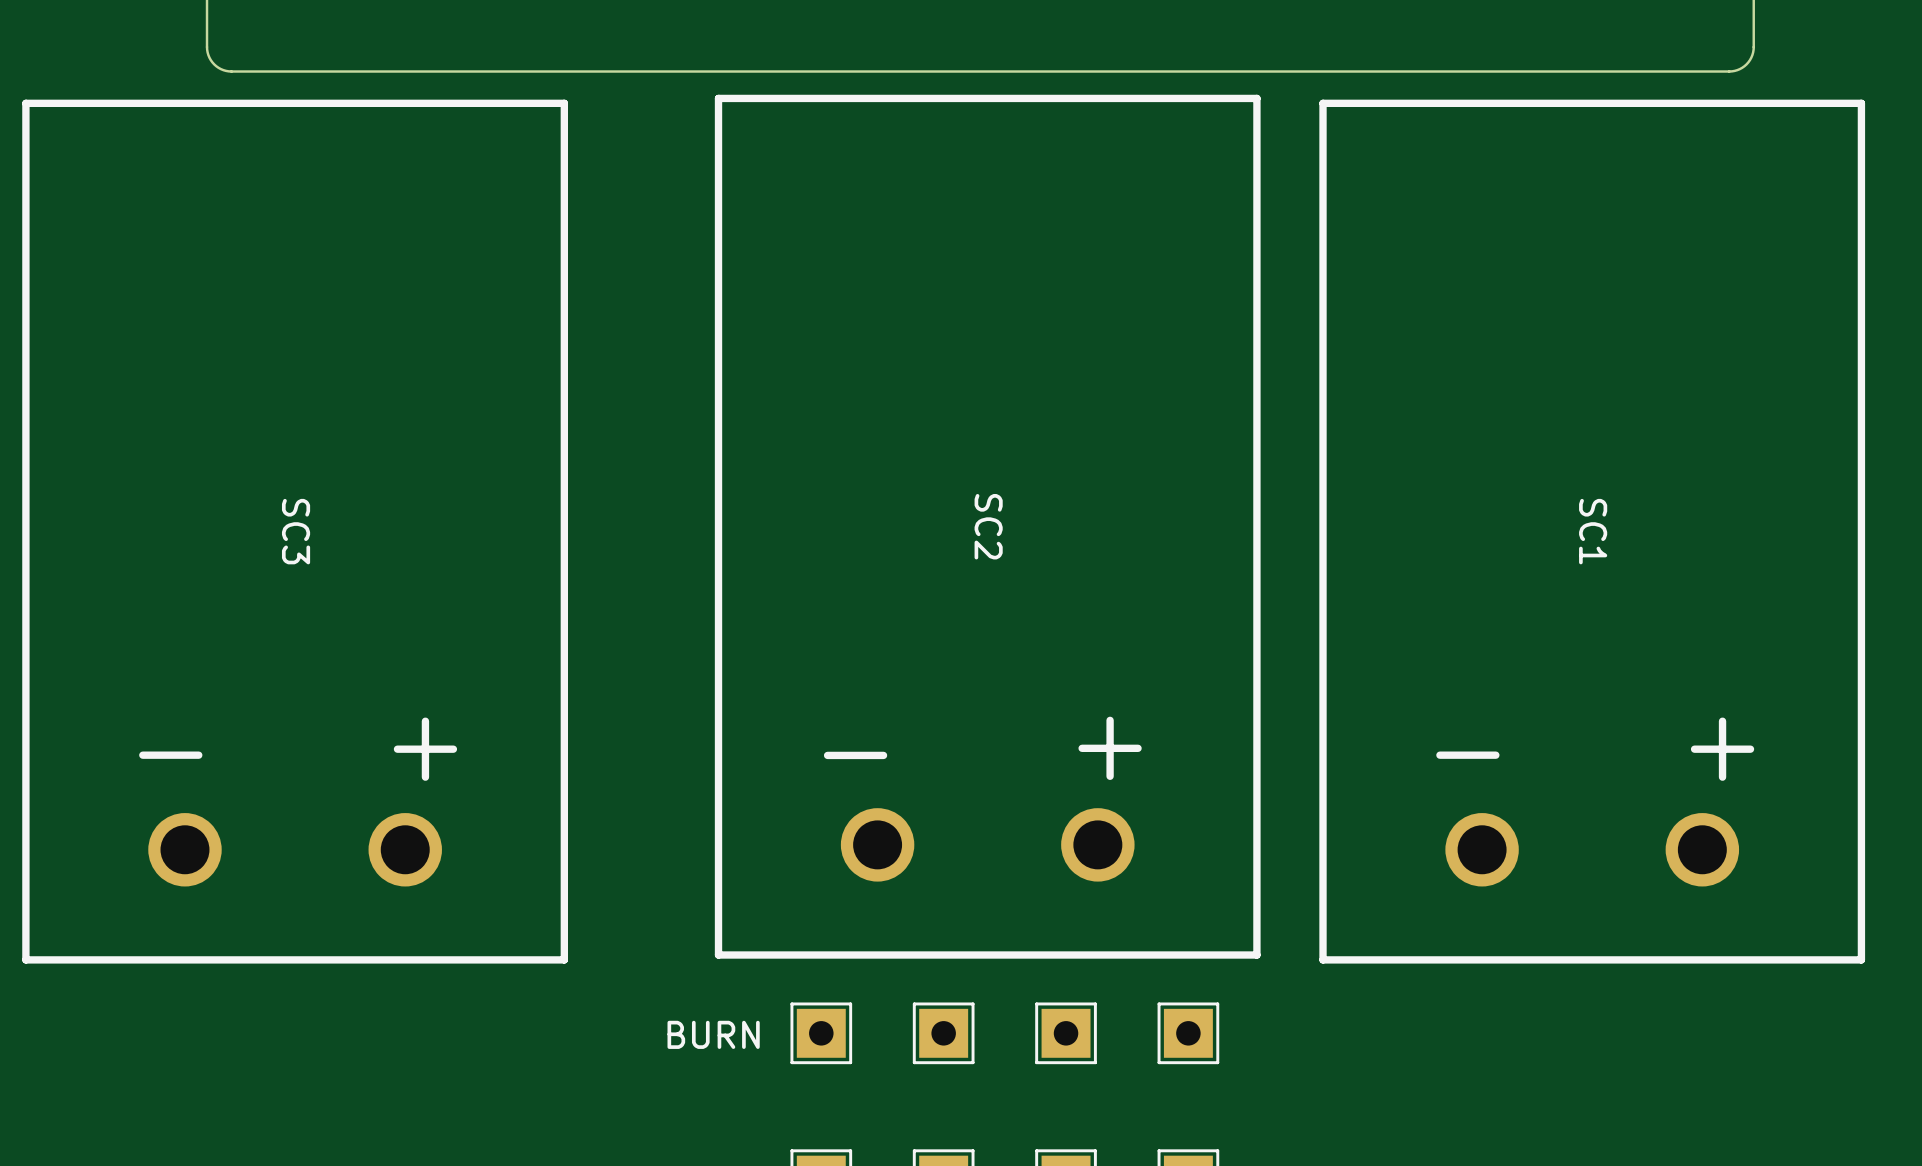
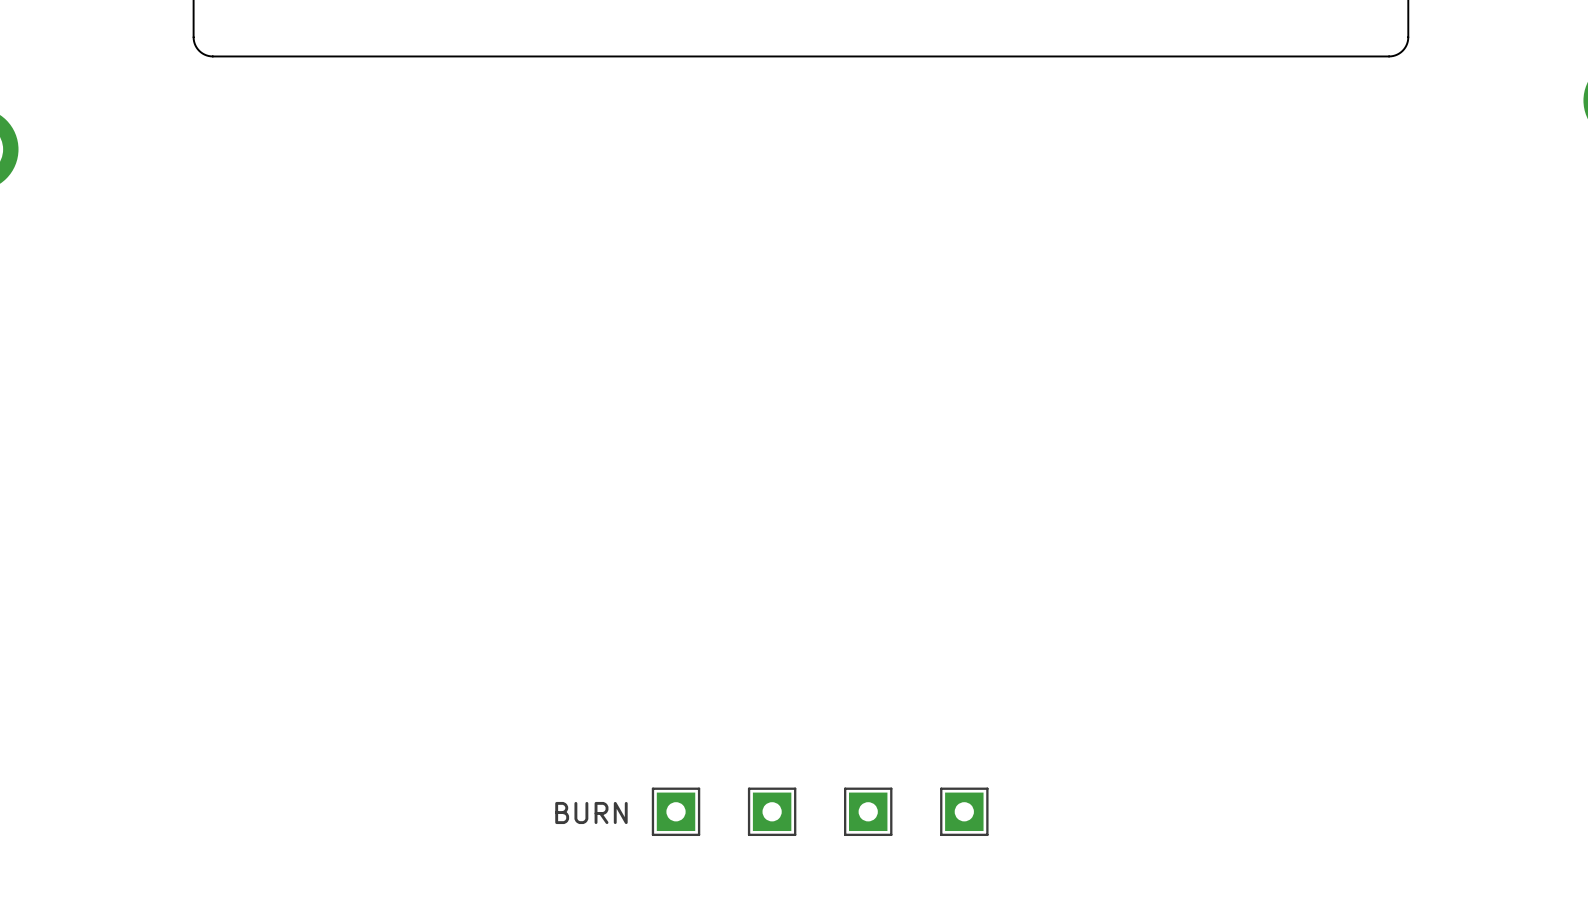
SC2: (987, 526) -> none
SC3: (295, 531) -> none
SC1: (1592, 531) -> none
text: + (1110, 748) -> none

